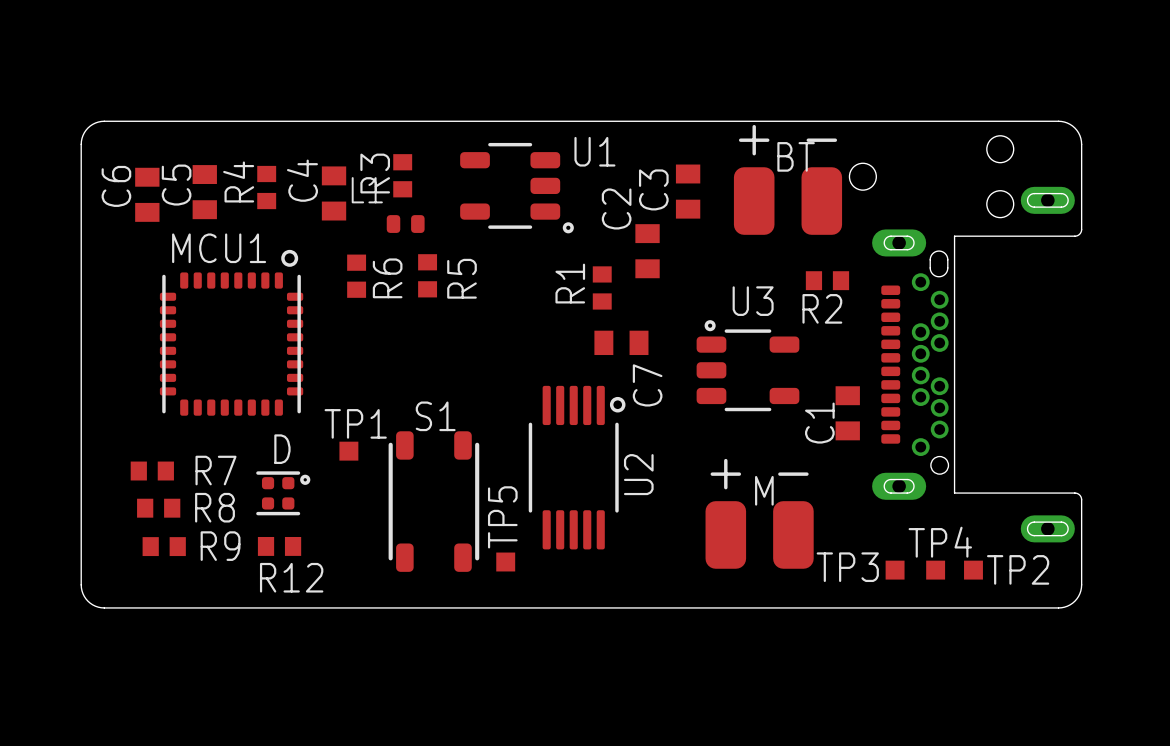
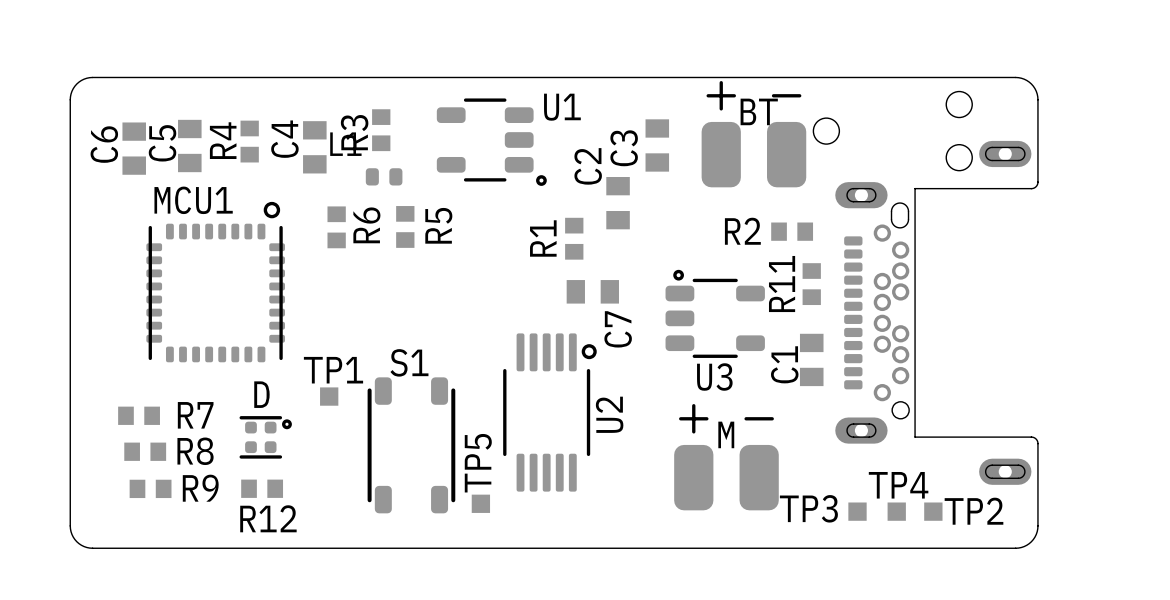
U3 name position: U3 (753, 301) -> U3 (714, 377)
R2 name position: R2 (822, 308) -> R2 (742, 231)
R11: none -> (811, 284)

